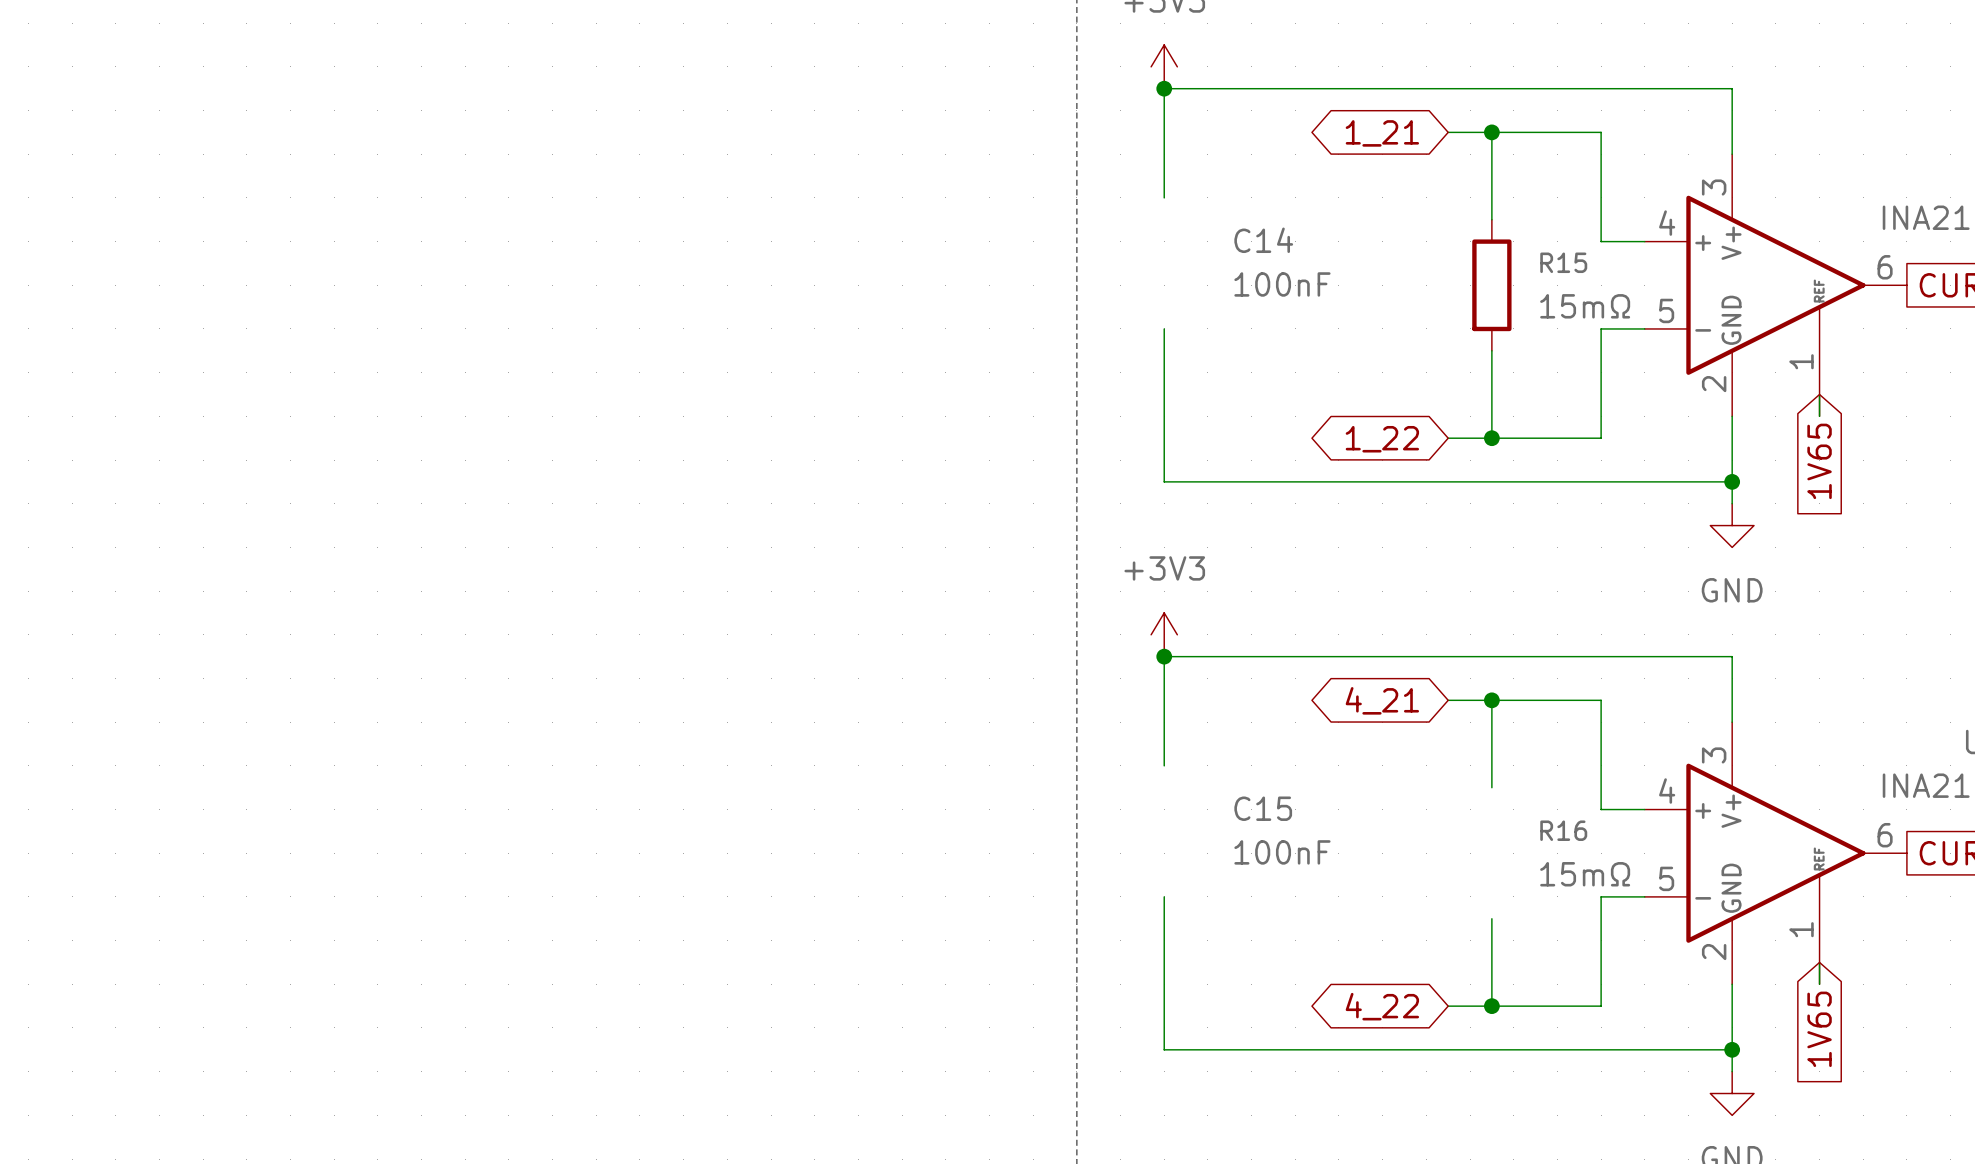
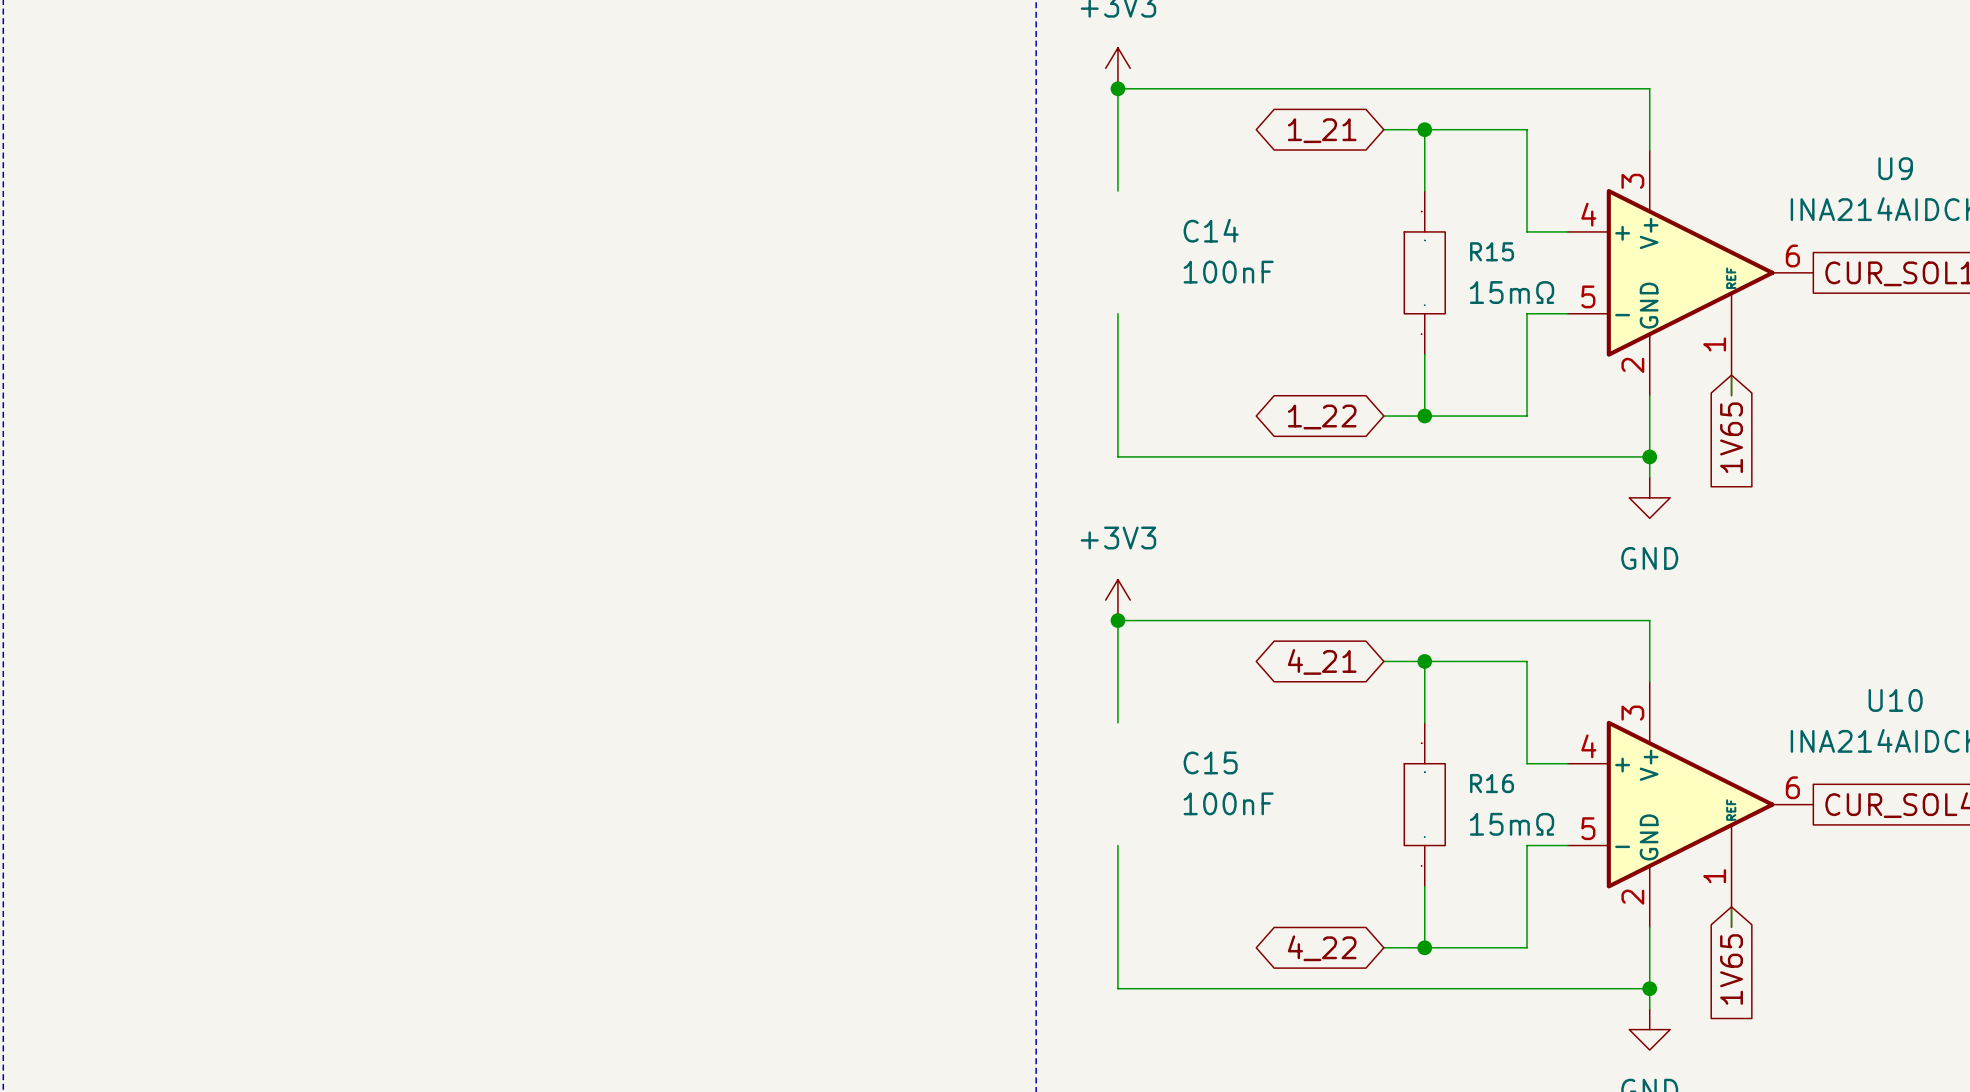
R15 symbol: [1472, 219, 1512, 351] -> [1404, 191, 1446, 355]
R16 symbol: [1540, 820, 1631, 887] -> [1404, 722, 1446, 887]

